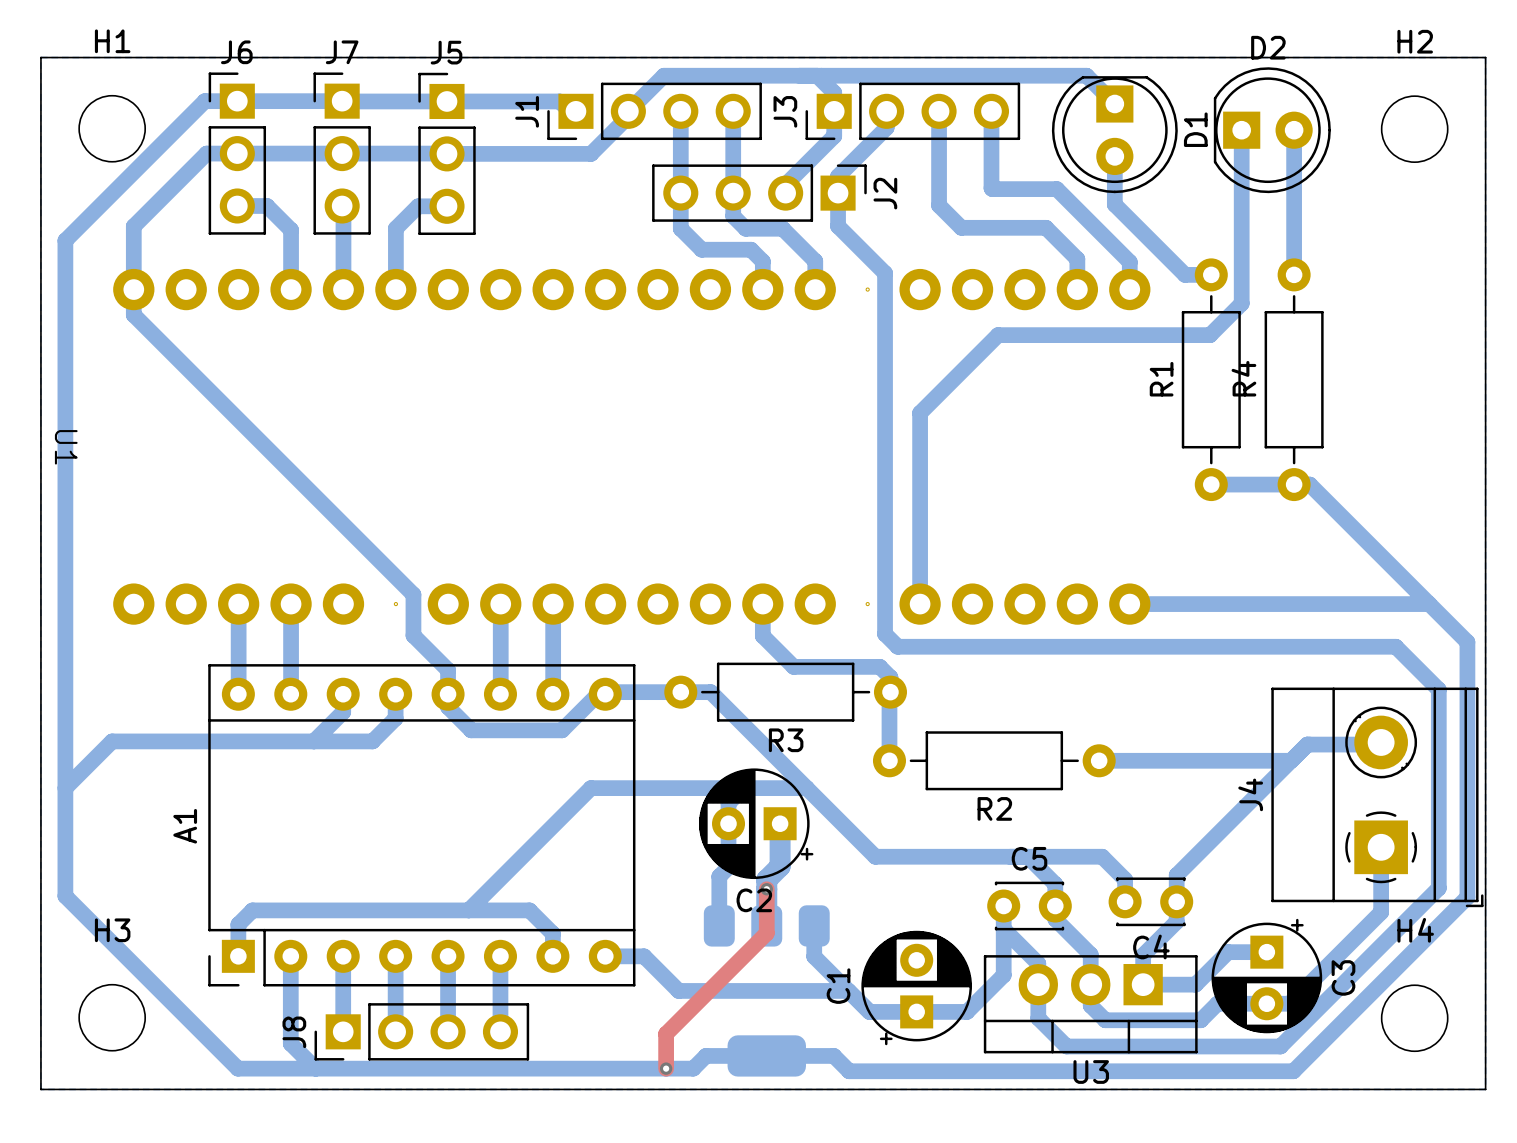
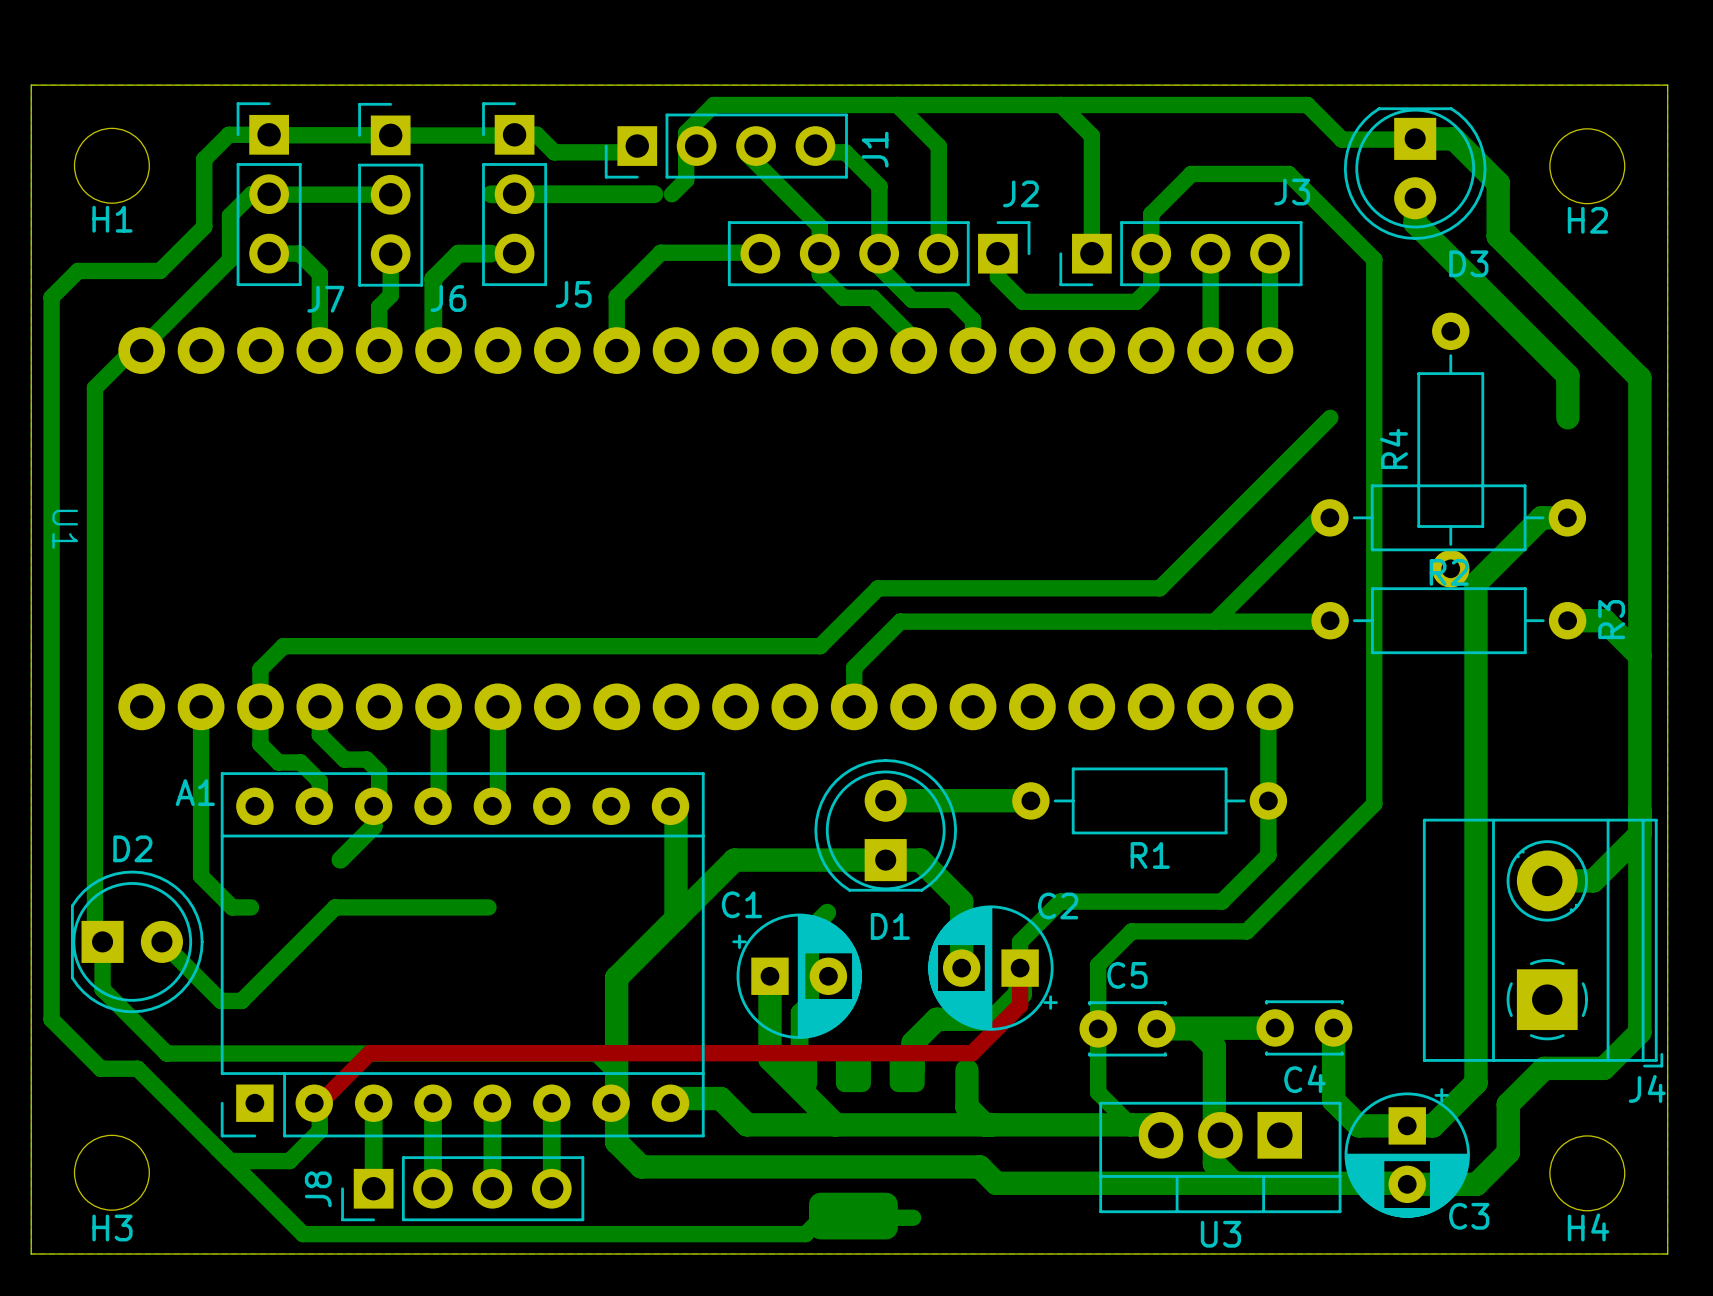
H1 name position: H1 (112, 41) -> H1 (112, 219)
H2 name position: H2 (1415, 41) -> H2 (1587, 220)
J6 name position: J6 (236, 52) -> J6 (448, 298)
J7 name position: J7 (342, 52) -> J7 (325, 299)
J5 name position: J5 (446, 52) -> J5 (573, 294)
bottom track: none -> (897, 105) (938, 146) (938, 253)
bottom track: (817, 75) (834, 92) (834, 136) (785, 184) (785, 193) -> none
bottom track: none -> (1061, 105) (1091, 135) (1091, 253)
bottom track: none -> (390, 135) (228, 134) (204, 159) (204, 226) (160, 270) (78, 270) (51, 297) (51, 1019) (100, 1068) (137, 1068) (303, 1234) (805, 1234) (821, 1217) (913, 1217)
bottom track: none -> (390, 135) (536, 134) (554, 152) (626, 152)
bottom track: (1114, 103) (1086, 75) (663, 75) (628, 111) (628, 116) (591, 153) -> none
J1 name position: J1 (527, 111) -> J1 (875, 149)
bottom track: (575, 111) (569, 111) (559, 101) (204, 101) (65, 240) (65, 896) (237, 1068) (693, 1068) (705, 1055) (833, 1055) (849, 1071) (1293, 1071) (1467, 897) (1467, 642) (1309, 484) (1211, 484) -> none
bottom track: (680, 111) (680, 228) (701, 249) (751, 249) (762, 261) (762, 289) -> none
bottom track: (733, 111) (733, 216) (745, 228) (782, 228) (815, 261) (815, 289) -> none
J3 name rotation: 0° (785, 111) -> 90° clockwise (1292, 192)
J3 name position: J3 (785, 111) -> J3 (1292, 192)
bottom track: (886, 111) (886, 127) (838, 176) (838, 226) (885, 273) (885, 634) (897, 646) (1395, 646) (1438, 689) (1438, 888) (1280, 1046) (1066, 1046) (1038, 1018) (1038, 963) (1003, 929) -> none
J3 position: (912, 111) -> (1180, 253)
bottom track: (939, 111) (939, 205) (961, 227) (1046, 227) (1077, 259) (1077, 289) -> none
bottom track: (991, 111) (991, 188) (1056, 189) (1129, 262) (1129, 289) -> none
bottom track: none -> (745, 152) (819, 226) (819, 274) (843, 297) (873, 297) (913, 338) (913, 350)
bottom track: none -> (804, 152) (845, 152) (879, 186) (879, 253)
D1 name position: D1 (1195, 129) -> D1 (890, 926)
bottom track: (1241, 130) (1241, 303) (1210, 335) (998, 335) (920, 413) (920, 604) -> none
D2 position: (1272, 130) -> (137, 941)
bottom track: (1294, 130) (1294, 274) -> none
D1 rotation: 0° (1114, 134) -> 180° (885, 825)
D1 position: (1114, 134) -> (885, 825)
D3: none -> (1415, 173)
J6 position: (237, 153) -> (390, 194)
J7 position: (342, 153) -> (269, 194)
bottom track: (447, 153) (206, 153) (133, 226) (133, 314) (413, 594) (413, 635) (448, 670) (448, 707) (471, 730) (562, 730) (598, 694) (605, 694) (607, 692) (710, 692) (875, 856) (1102, 856) (1125, 879) (1125, 901) -> none
J5 position: (447, 153) -> (514, 194)
bottom track: none -> (671, 194) (686, 180) (686, 132) (713, 105) (1307, 105) (1342, 139) (1454, 138) (1498, 183) (1498, 236) (1639, 378) (1639, 1032) (1603, 1068) (1544, 1068) (1508, 1104) (1508, 1152) (1476, 1184) (996, 1183) (979, 1166) (641, 1166) (616, 1142) (616, 977) (734, 860) (920, 860) (961, 901) (961, 968)
bottom track: none -> (390, 194) (251, 194) (229, 215) (229, 259) (141, 348) (141, 350) (132, 350) (94, 387) (94, 934) (102, 941) (102, 989) (166, 1053) (596, 1053) (616, 1073) (616, 1098)
bottom track: (1114, 156) (1114, 204) (1185, 274) (1211, 274) -> none
bottom track: none -> (1415, 198) (1415, 223) (1567, 375) (1567, 417)
J2 footprint: [652, 164, 867, 222] -> [727, 221, 1031, 287]
J2 name position: J2 (885, 193) -> J2 (1020, 193)
bottom track: (237, 206) (266, 206) (291, 230) (291, 289) -> none
bottom track: none -> (269, 253) (299, 253) (319, 273) (319, 350)
bottom track: (342, 206) (343, 289) -> none
bottom track: none -> (390, 254) (390, 295) (379, 306) (379, 350)
bottom track: none -> (760, 253) (660, 252) (616, 296) (616, 350)
bottom track: none -> (879, 253) (879, 267) (912, 299) (952, 299) (973, 320) (973, 350)
bottom track: none -> (997, 253) (997, 277) (1022, 301) (1136, 301) (1151, 286) (1151, 214) (1191, 173) (1288, 173) (1374, 259) (1374, 803) (1246, 931) (1131, 931) (1098, 964) (1098, 1092) (1130, 1124)
bottom track: none -> (1210, 253) (1210, 350)
bottom track: none -> (1270, 253) (1270, 350)
U1 footprint: [113, 268, 1151, 625] -> [118, 327, 1294, 731]
bottom track: none -> (1330, 417) (1159, 588) (878, 588) (820, 646) (283, 646) (260, 669) (260, 744) (278, 762) (300, 762) (319, 781) (319, 801)
R1 name position: R1 (1161, 379) -> R1 (1150, 855)
R1 rotation: 0° (1211, 379) -> 90° clockwise (1149, 800)
R1 position: (1211, 379) -> (1149, 800)
bottom track: none -> (1329, 517) (1318, 517) (1214, 621)
bottom track: none -> (1567, 517) (1541, 517) (1475, 583) (1475, 1082) (1432, 1125) (1358, 1125) (1333, 1100) (1333, 1027)
bottom track: none -> (1330, 620) (900, 621) (854, 667) (854, 706)
bottom track: none -> (1567, 620) (1604, 620) (1639, 656)
bottom track: (238, 604) (238, 693) -> none
bottom track: (291, 604) (291, 693) -> none
bottom track: (500, 604) (500, 693) -> none
bottom track: (553, 604) (553, 693) -> none
bottom track: (762, 604) (762, 636) (793, 666) (879, 666) (890, 677) (889, 760) -> none
bottom track: (1129, 604) (1429, 604) -> none
bottom track: none -> (201, 706) (201, 876) (232, 907) (251, 907)
bottom track: none -> (319, 706) (319, 734) (344, 759) (366, 759) (379, 771) (379, 801)
bottom track: none -> (438, 706) (438, 801)
bottom track: none -> (497, 706) (497, 801)
bottom track: none -> (1269, 706) (1268, 708) (1268, 855) (1221, 901) (1060, 901) (1020, 941) (1020, 994) (994, 1019) (936, 1019) (913, 1042) (913, 1070)
bottom track: none -> (885, 800) (1030, 800)
bottom track: none -> (676, 801) (676, 918)
R3 position: (785, 692) -> (1448, 620)
bottom track: (395, 694) (395, 718) (372, 741) (112, 741) (65, 788) -> none
bottom track: none -> (1639, 834) (1593, 880) (1547, 880)
R3 name rotation: 0° (786, 740) -> 90° counterclockwise (1611, 619)
R3 name position: R3 (786, 740) -> R3 (1611, 619)
bottom track: (1381, 742) (1379, 744) (1307, 744) (1176, 875) (1176, 921) (1143, 955) (1143, 984) (1195, 984) (1228, 952) (1266, 952) -> none
R2 position: (994, 760) -> (1448, 517)
bottom track: (1099, 760) (1291, 760) -> none
bottom track: none -> (488, 907) (335, 907) (241, 1000) (220, 1000) (161, 941)
bottom track: (806, 788) (590, 788) (468, 910) -> none
J4 name rotation: 0° (1250, 794) -> 90° clockwise (1647, 1088)
J4 name position: J4 (1250, 794) -> J4 (1647, 1088)
J4 position: (1377, 797) -> (1543, 943)
C2 position: (756, 823) -> (993, 968)
A1 name rotation: 0° (185, 826) -> 90° clockwise (195, 792)
A1 name position: A1 (185, 826) -> A1 (195, 792)
bottom track: (776, 827) (780, 823) (780, 866) (766, 879) (766, 925) -> none
top track: none -> (1020, 968) (1020, 1005) (972, 1053) (369, 1053) (324, 1098) (319, 1098)
bottom track: none -> (769, 976) (769, 1059) (835, 1124)
bottom track: (1381, 847) (1381, 912) (1289, 1003) (1217, 1003) (1200, 1020) (1105, 1020) (1090, 1005) (1090, 954) (1055, 919) (1055, 884) (1027, 856) -> none
top track: (766, 889) (766, 933) (666, 1033) (666, 1068) -> none
via: (766, 889) -> none
bottom track: none -> (1274, 1028) (1156, 1028) (1196, 1028) (1214, 1047) (1214, 1163) (1234, 1183)
C2 name position: C2 (754, 900) -> C2 (1058, 905)
C4 position: (1150, 901) -> (1304, 1027)
bottom track: (1003, 906) (1003, 975) (967, 1011) (869, 1011) (814, 956) (814, 925) -> none
C5 position: (1029, 906) -> (1127, 1028)
bottom track: none -> (966, 1070) (966, 1106) (984, 1124)
H3 name position: H3 (112, 930) -> H3 (112, 1227)
H4 name position: H4 (1415, 930) -> H4 (1588, 1227)
bottom track: none -> (319, 1098) (319, 1130) (289, 1161) (229, 1161)
bottom track: none -> (676, 1098) (720, 1098) (746, 1124) (1152, 1124) (1155, 1127)
bottom track: (238, 956) (238, 924) (252, 910) (529, 910) (552, 933) (552, 956) -> none
bottom track: (290, 956) (290, 1043) (315, 1068) -> none
bottom track: (605, 956) (644, 956) (678, 990) (848, 990) -> none
C3 position: (1266, 976) -> (1407, 1152)
C3 name rotation: 0° (1343, 977) -> 90° clockwise (1469, 1216)
C3 name position: C3 (1343, 977) -> C3 (1469, 1216)
C1 name position: C1 (838, 986) -> C1 (741, 904)
C1 rotation: 0° (916, 988) -> 90° clockwise (797, 976)
C1 position: (916, 988) -> (797, 976)
via: (666, 1068) -> none

